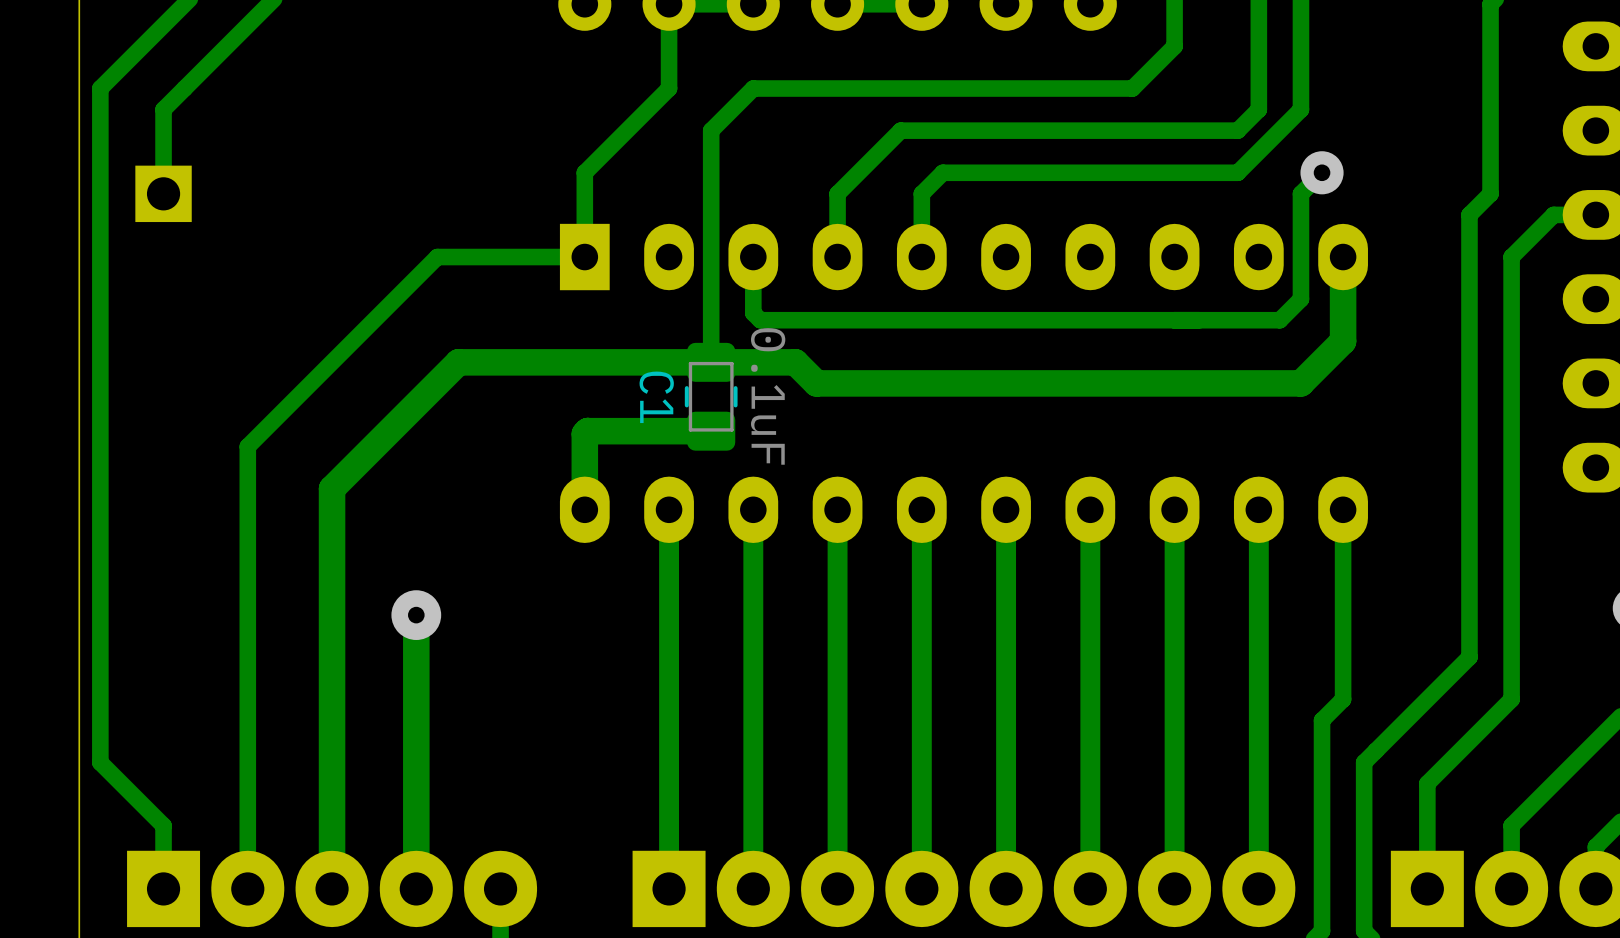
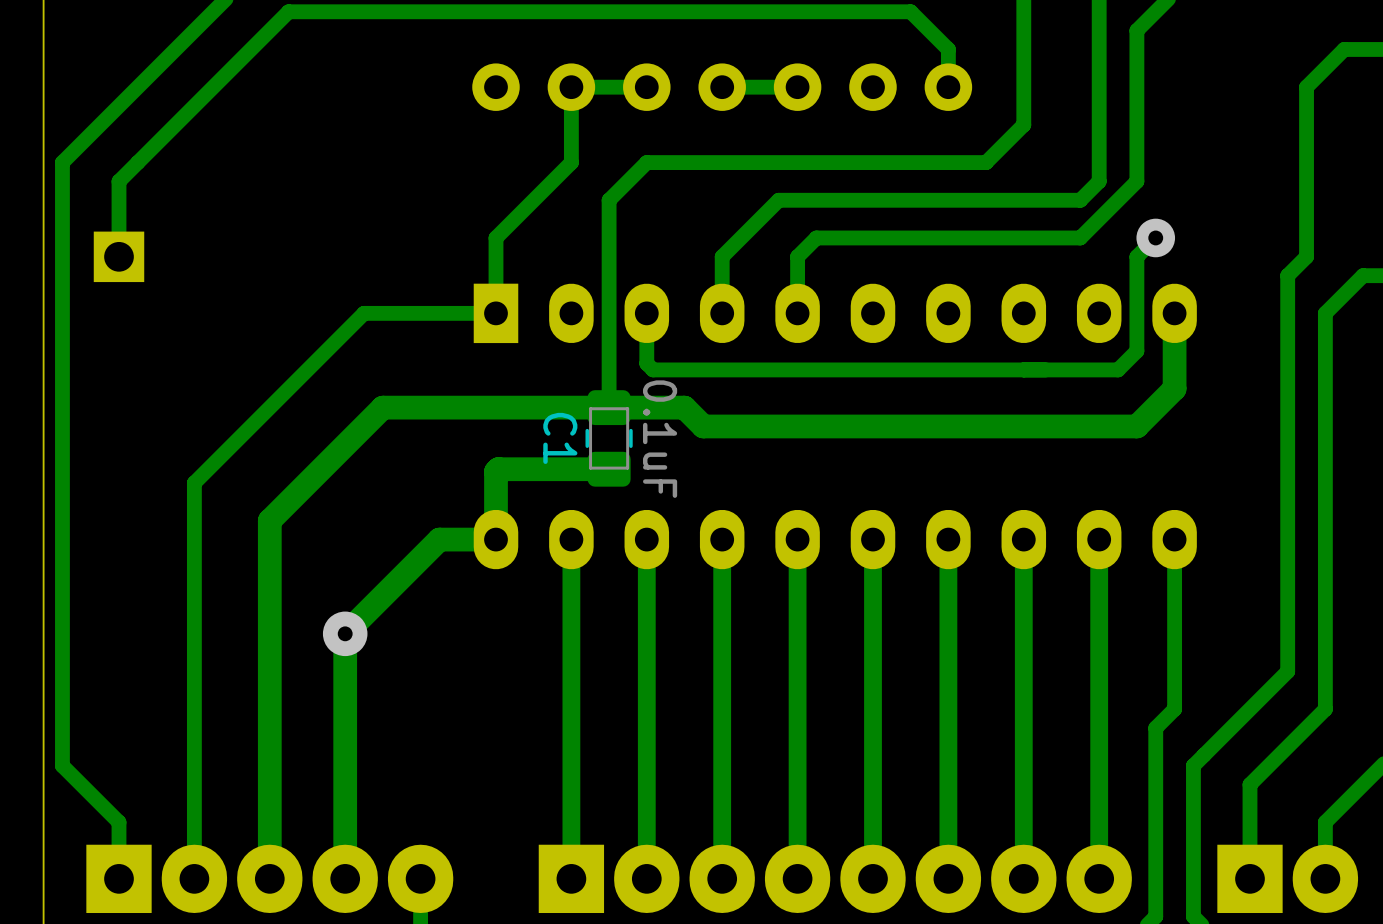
track: none -> (495, 539) (439, 539) (345, 633)

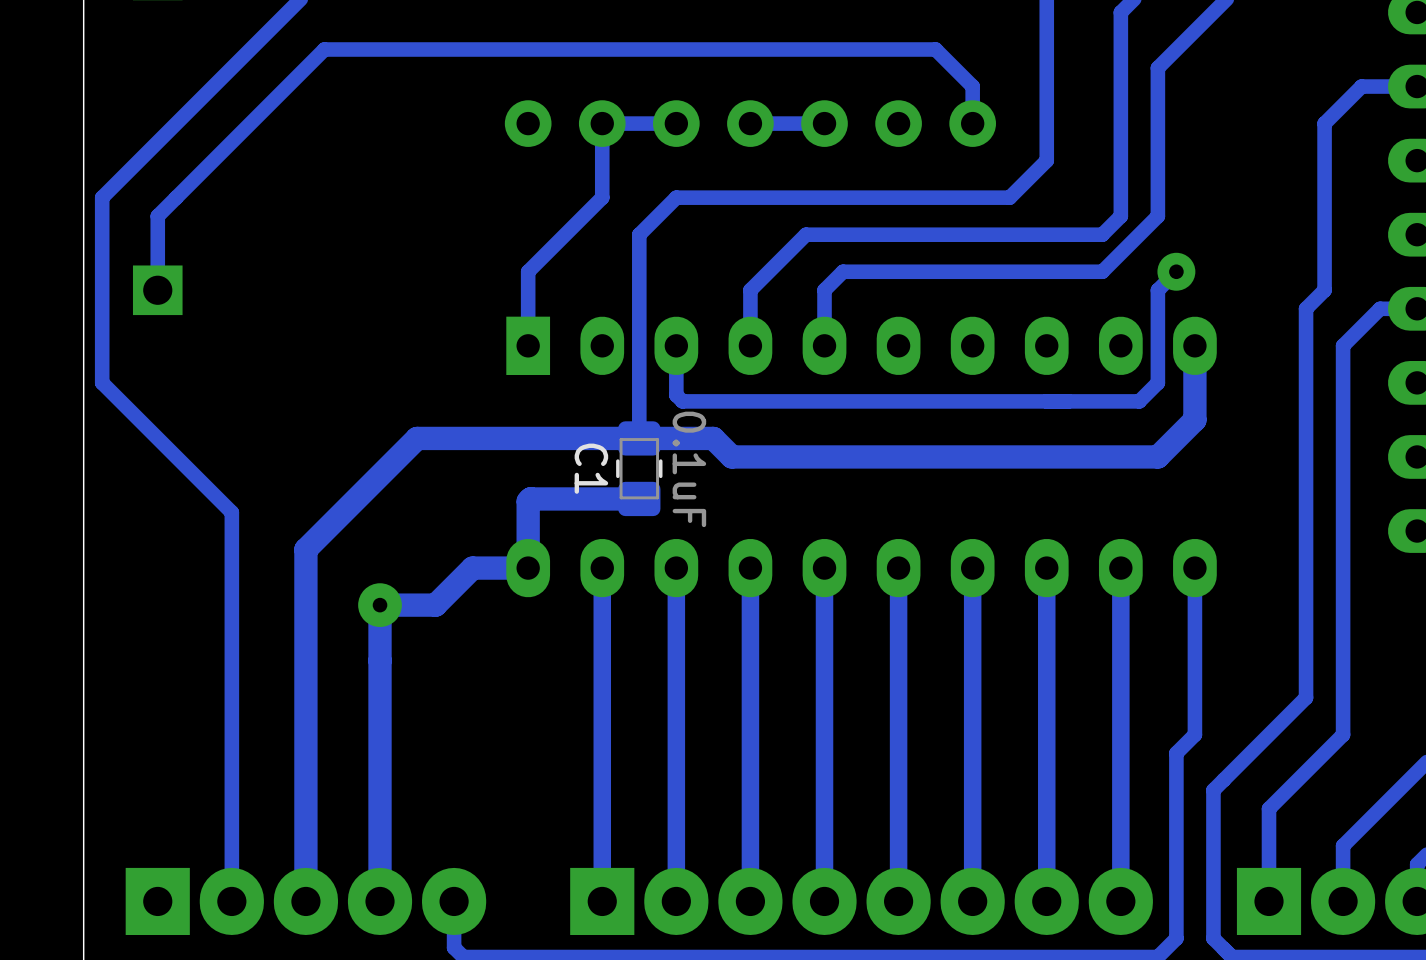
track: (495, 313) (364, 313) (194, 483) -> none
track: (62, 351) (62, 765) (119, 822) (119, 878) -> (102, 382) (231, 512)
track: (401, 577) (345, 633) -> (435, 605) (380, 605) (380, 660)
via position: (345, 633) -> (380, 605)

